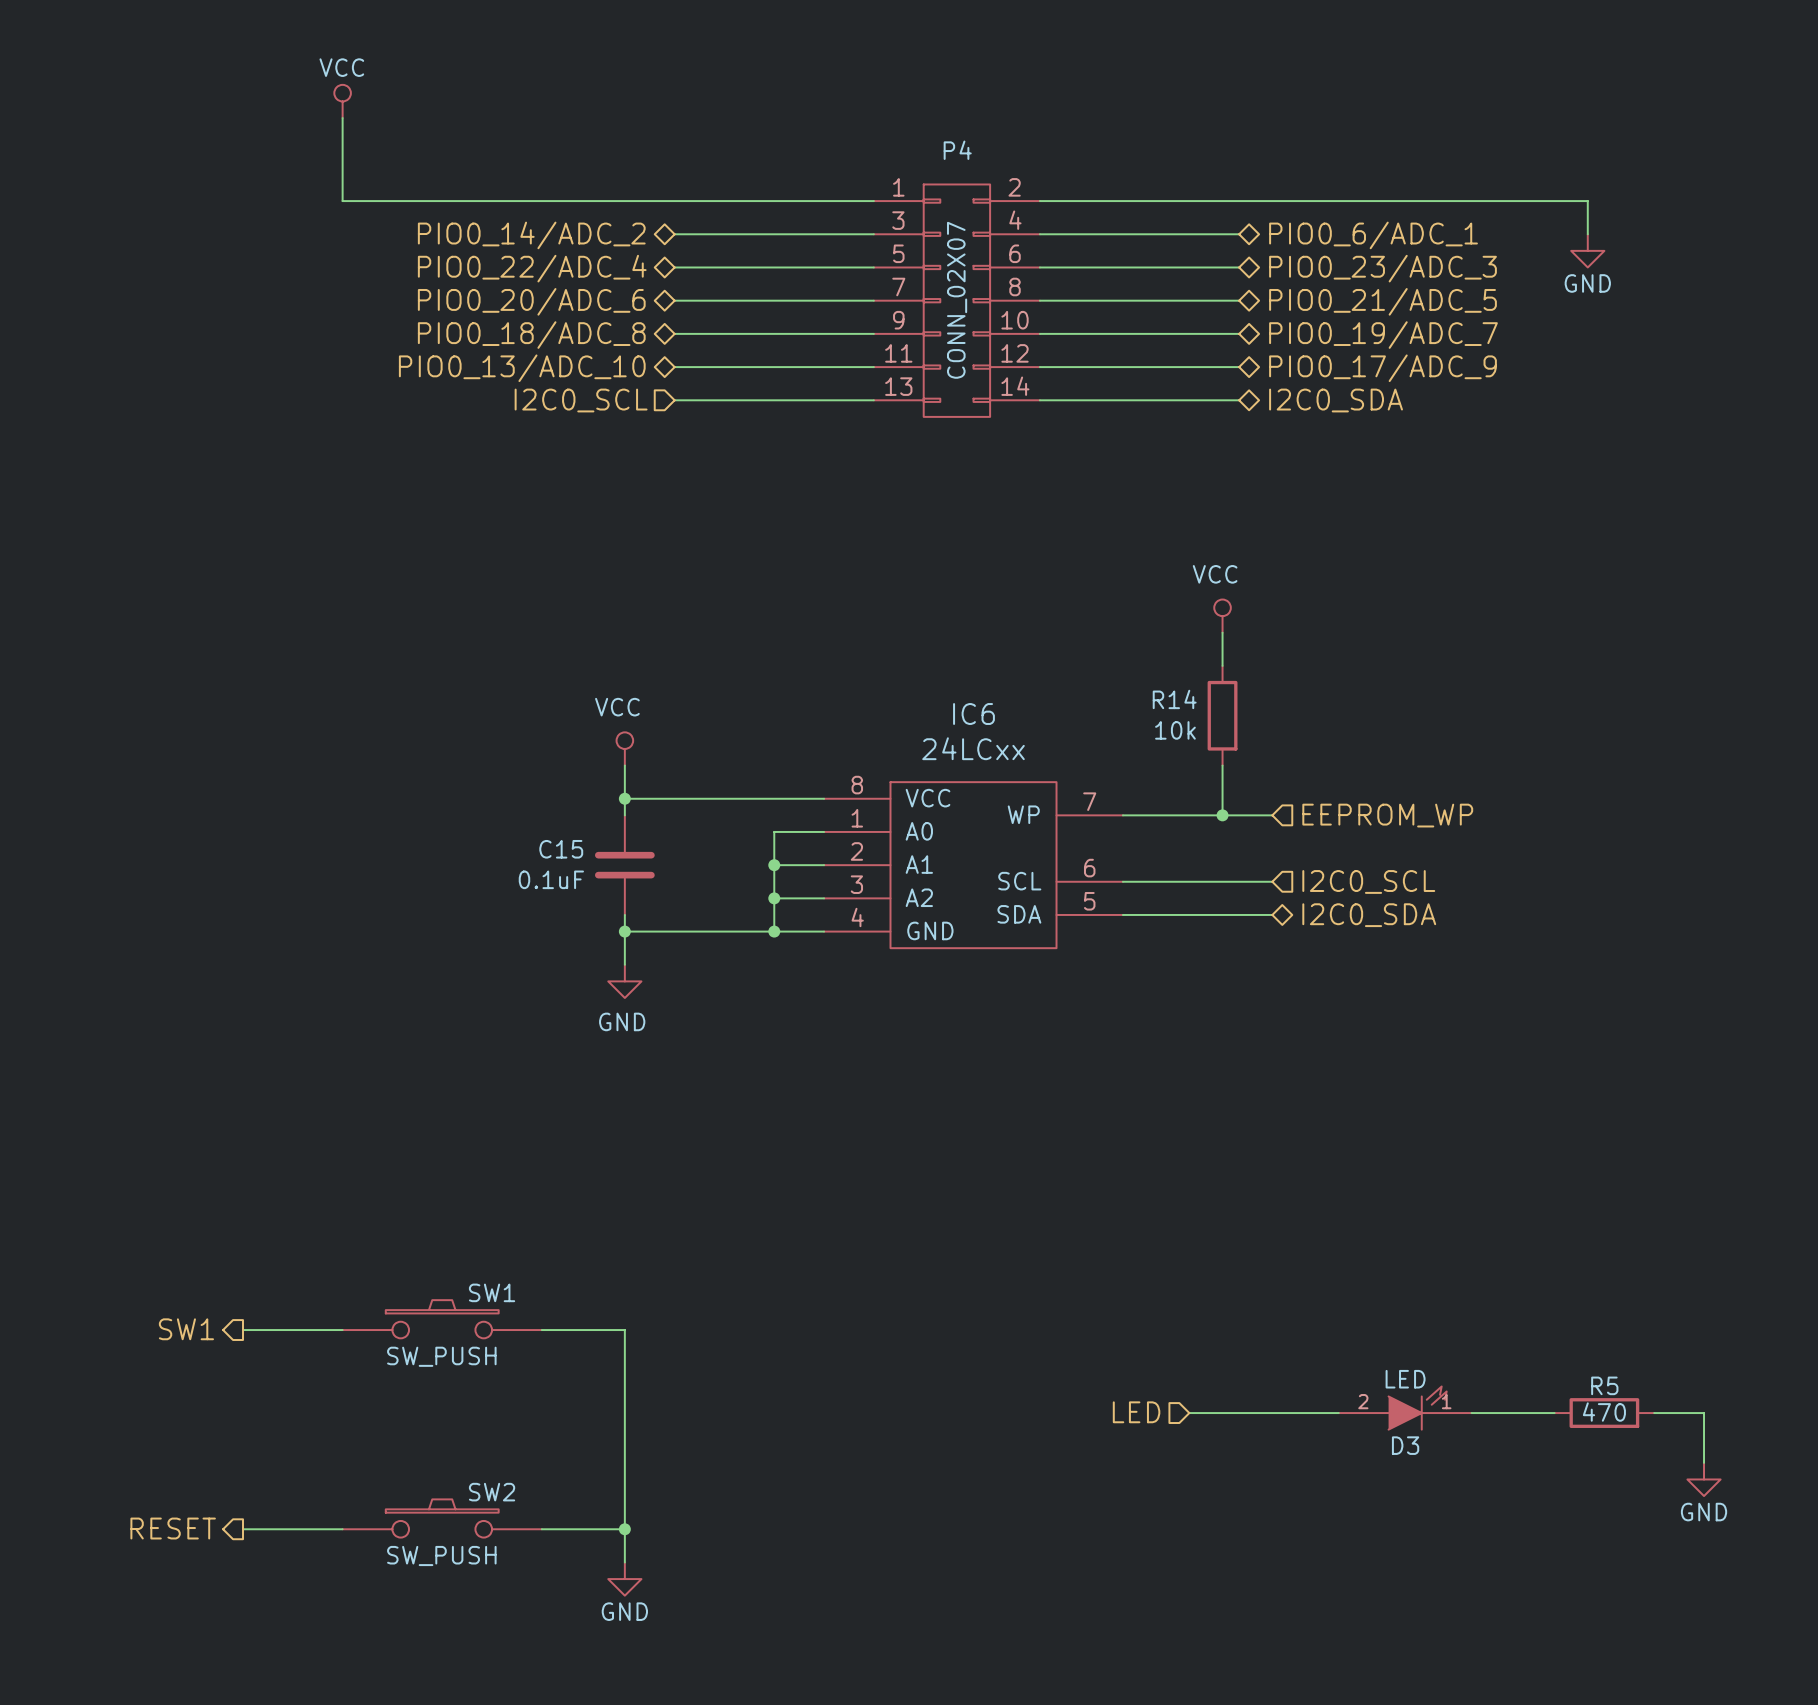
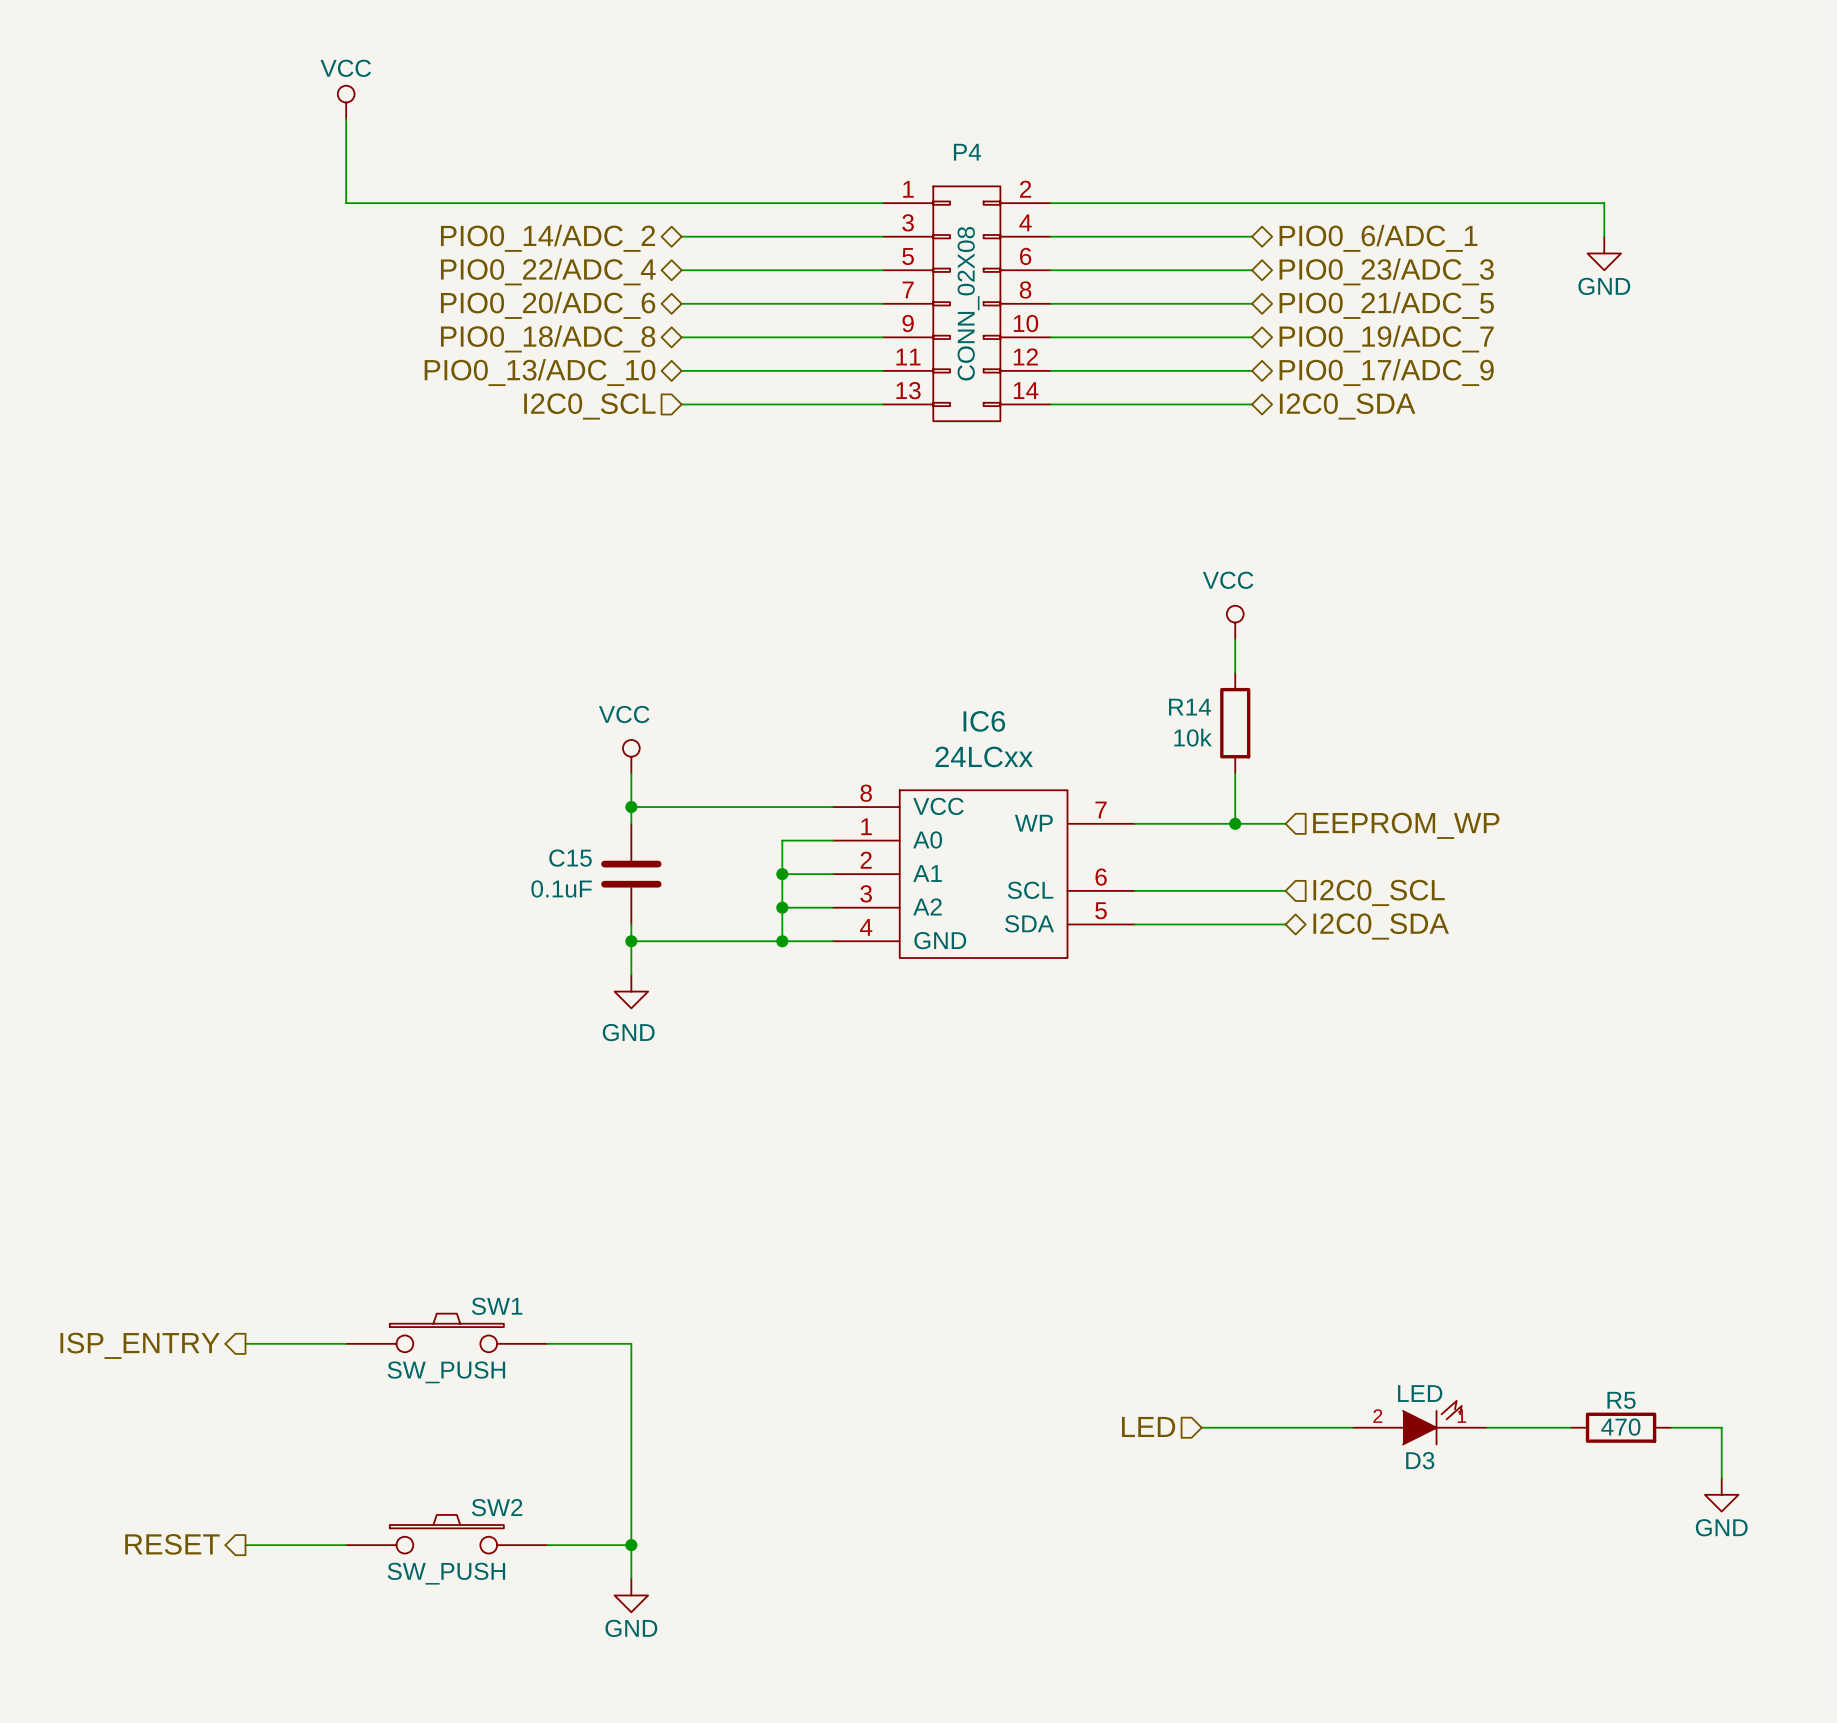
P4 value: CONN_02X07 (957, 300) -> CONN_02X08 (968, 303)
hierarchical label: SW1 (186, 1329) -> ISP_ENTRY (140, 1345)

